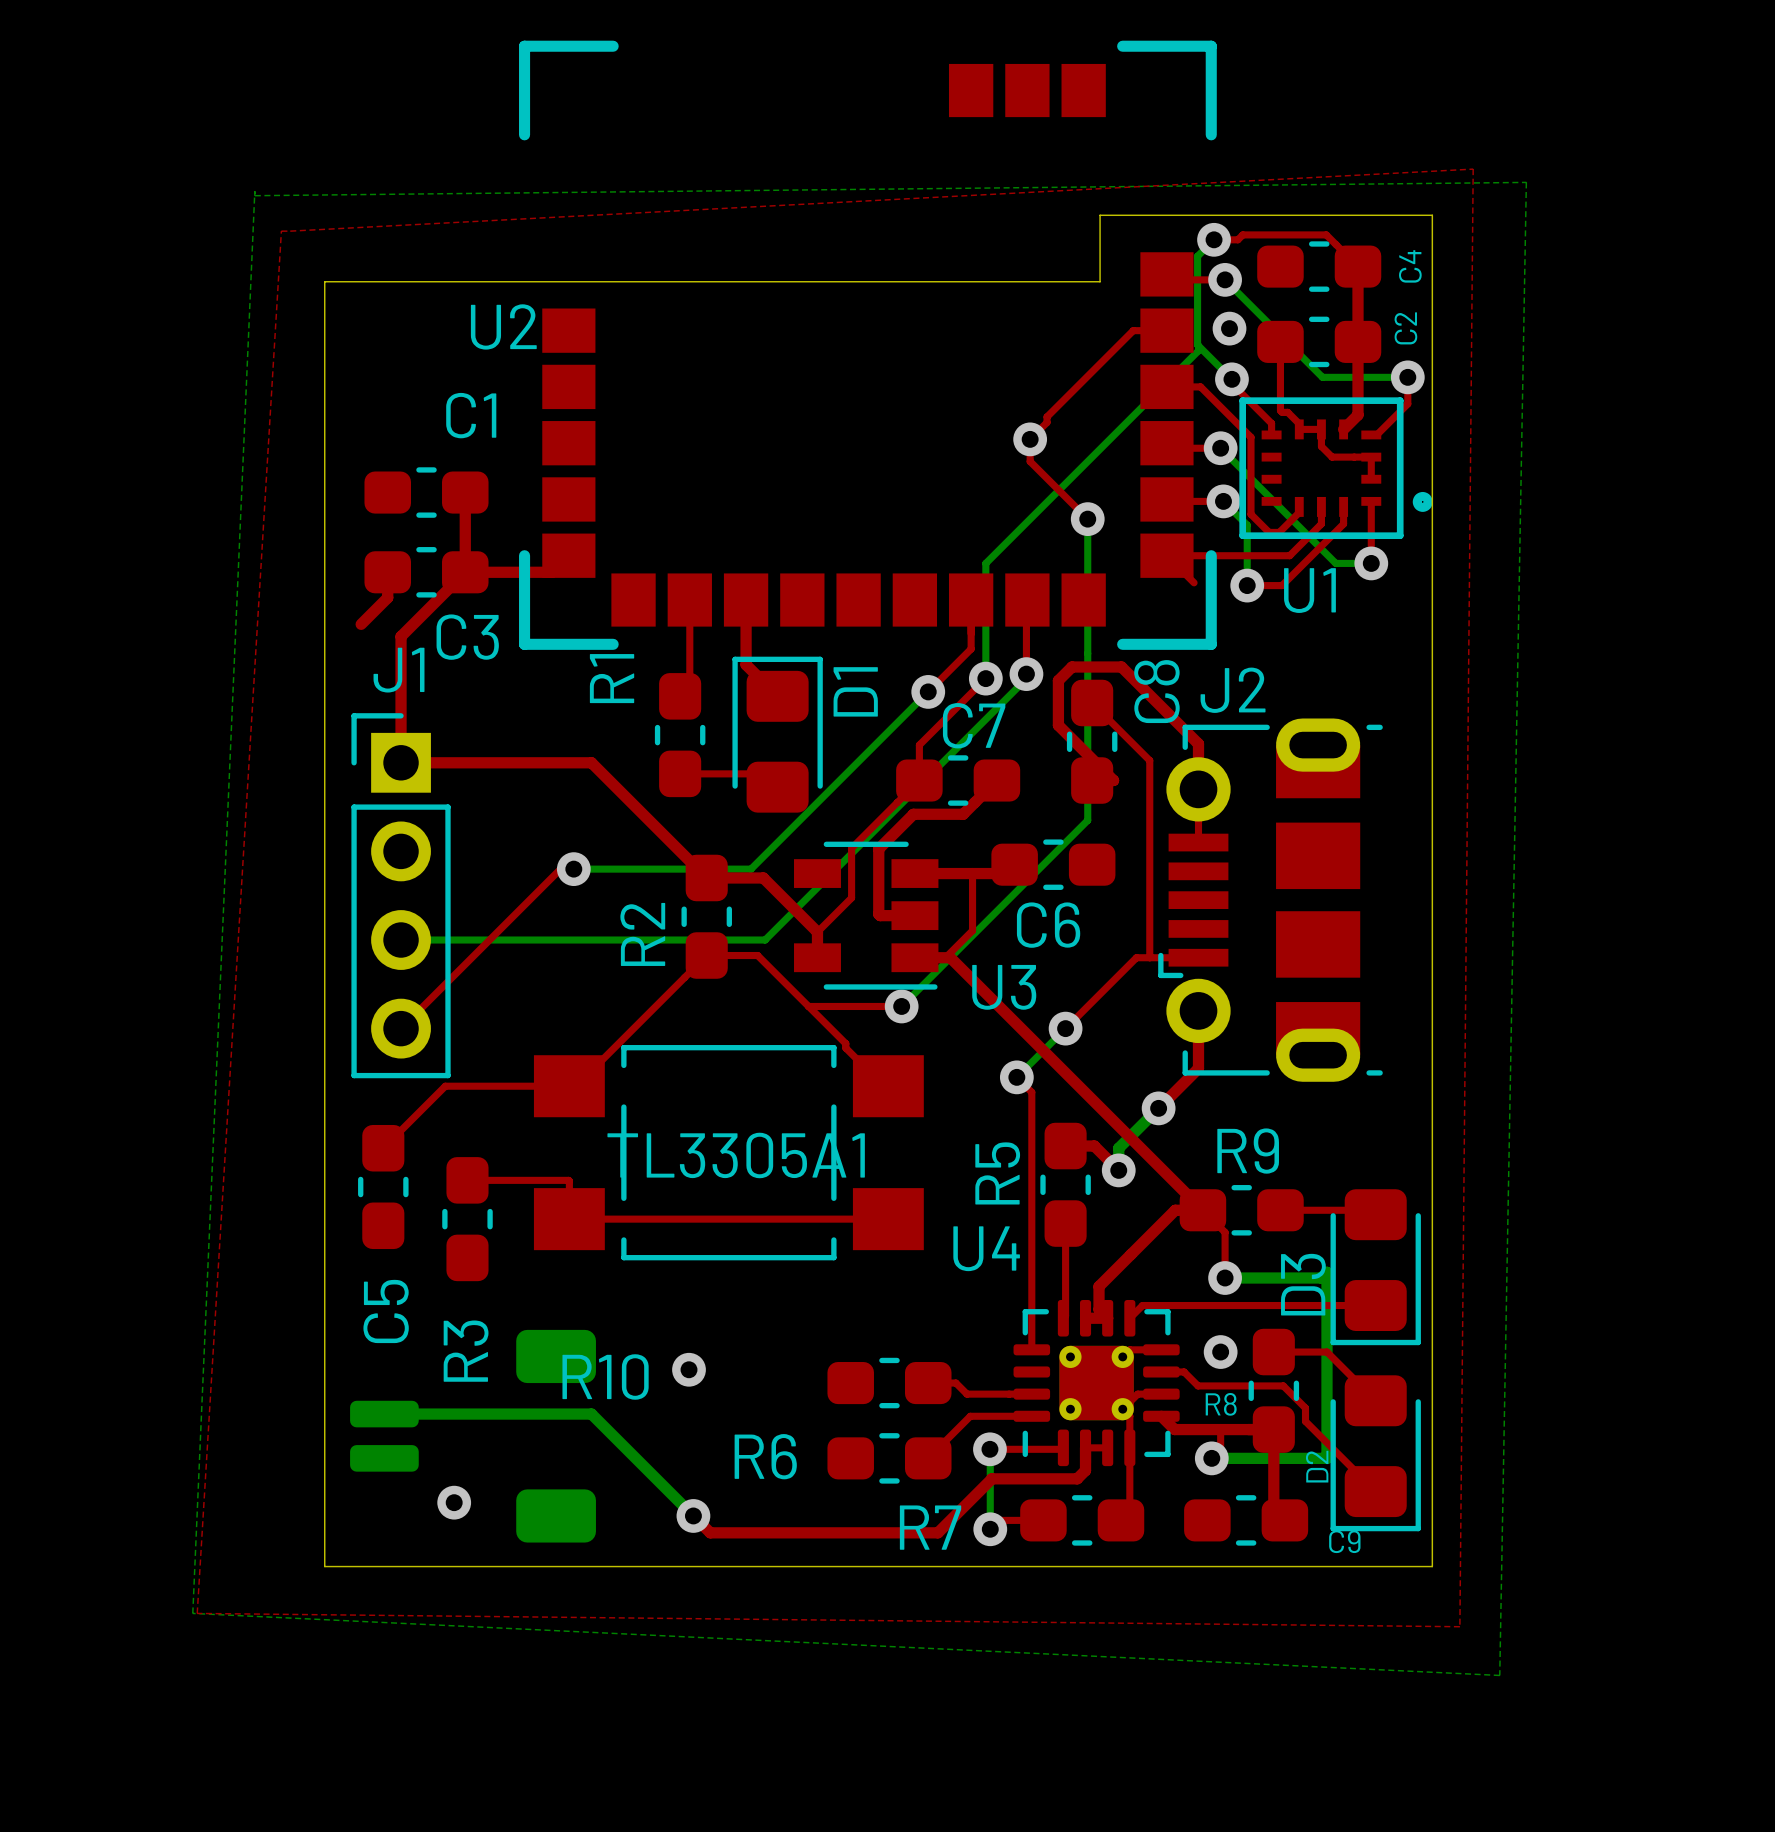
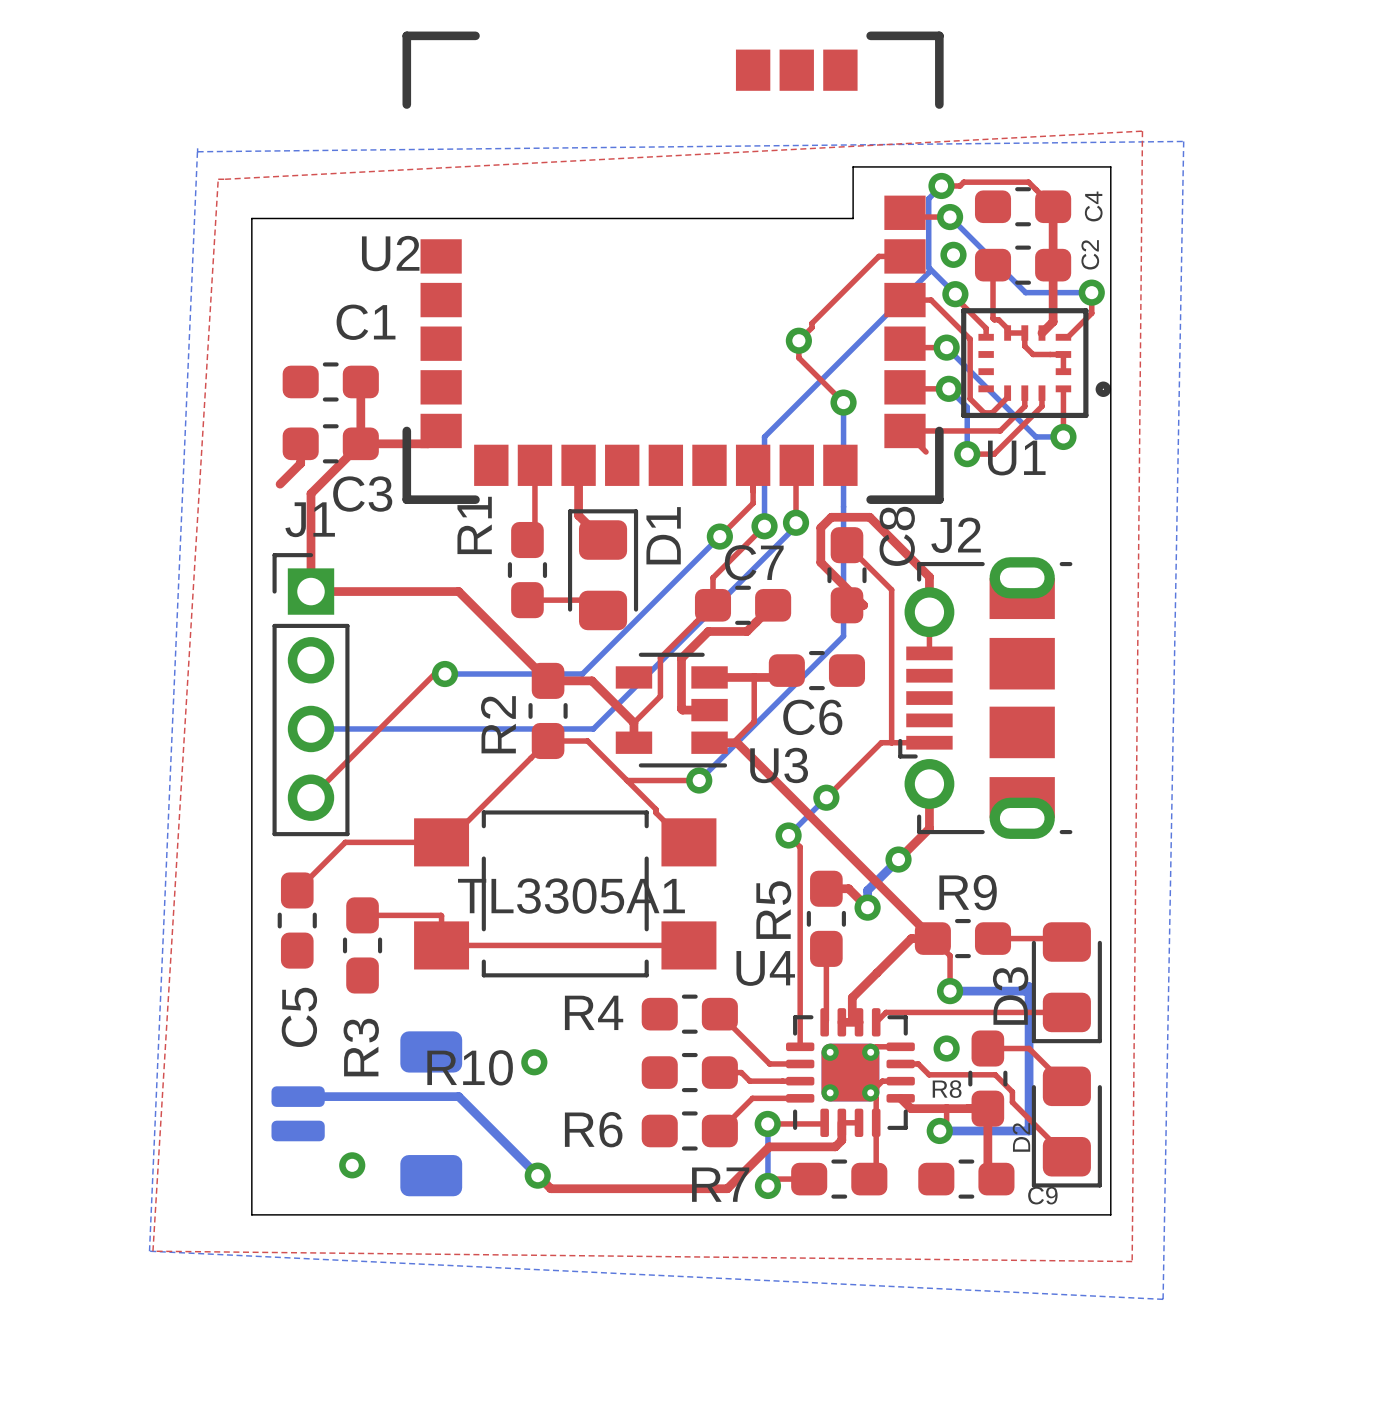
R4: none -> (689, 1014)
top track: none -> (719, 1014) (769, 1063) (800, 1063)

